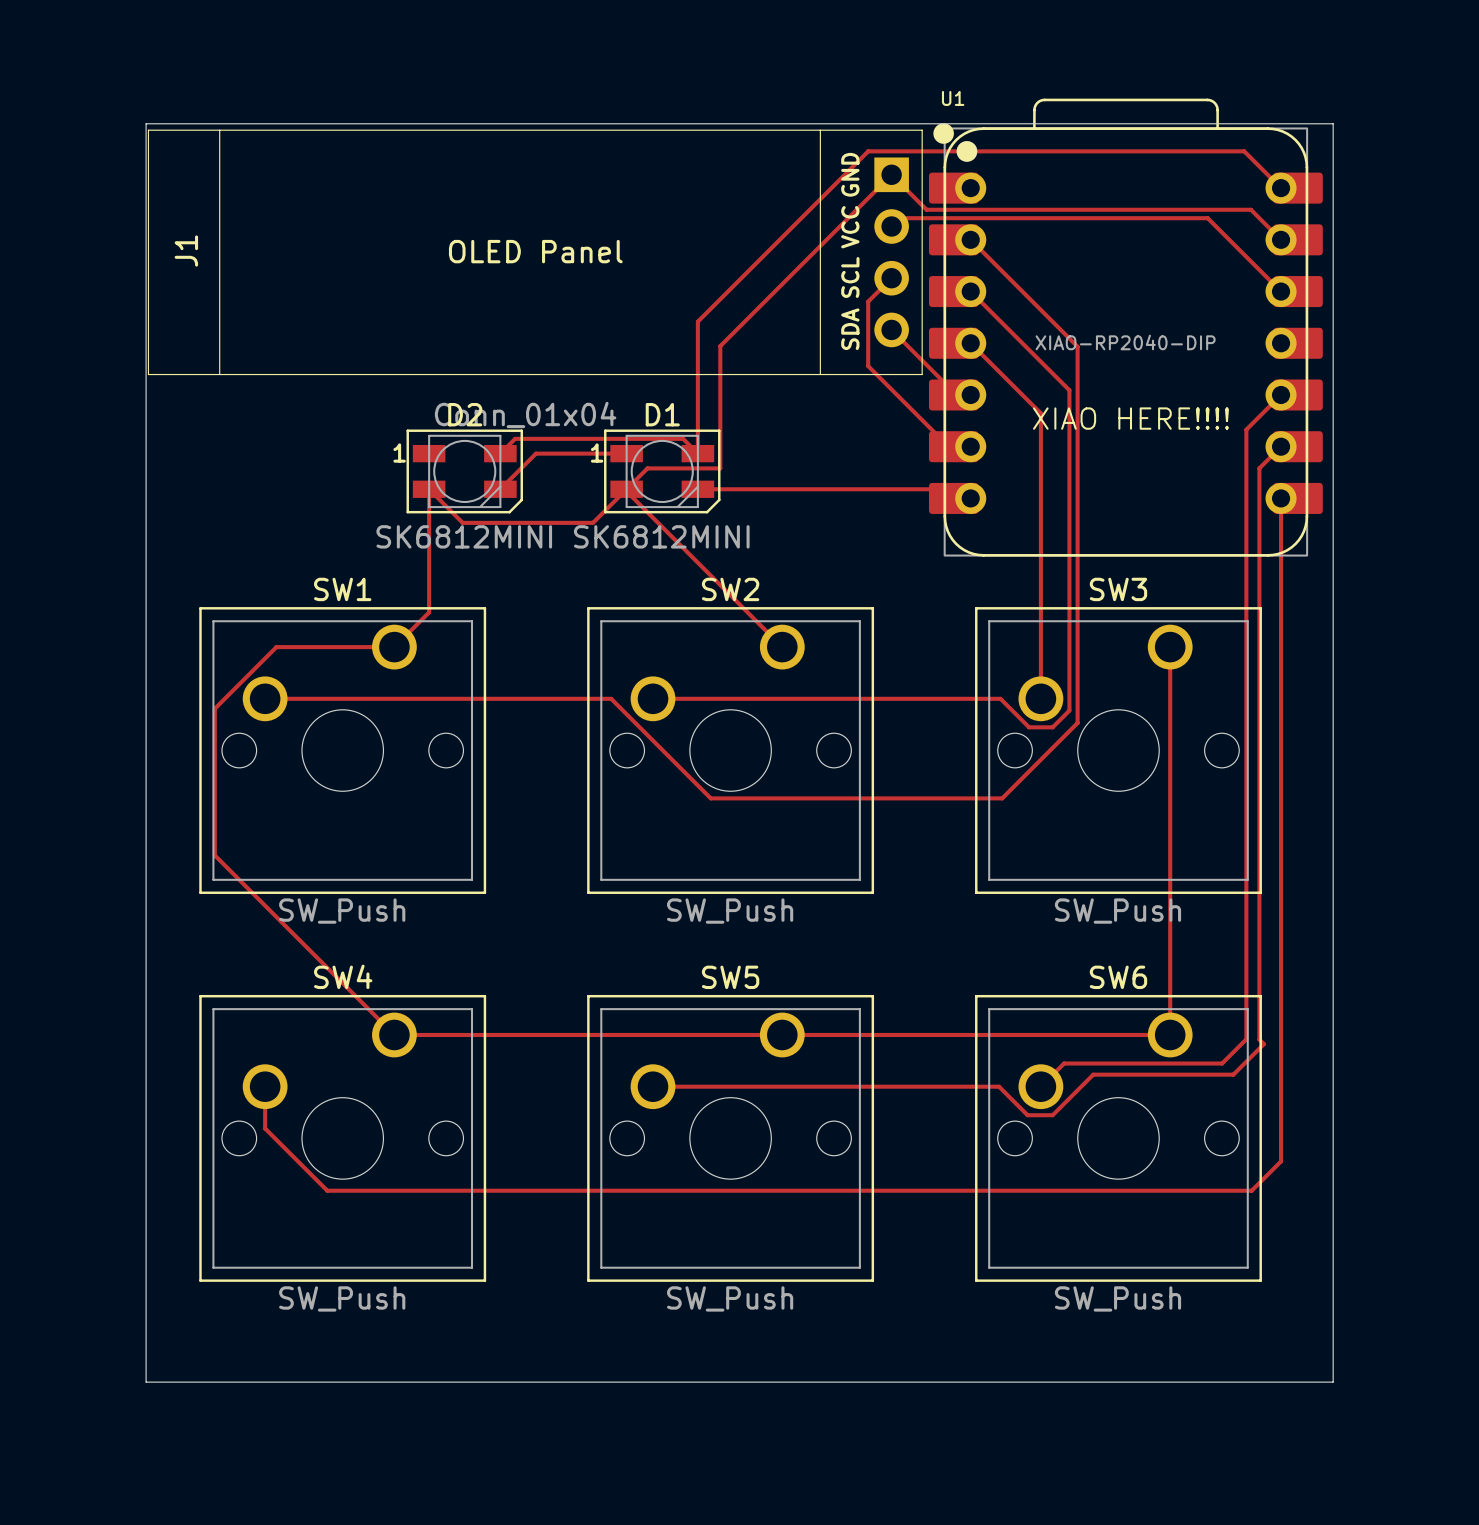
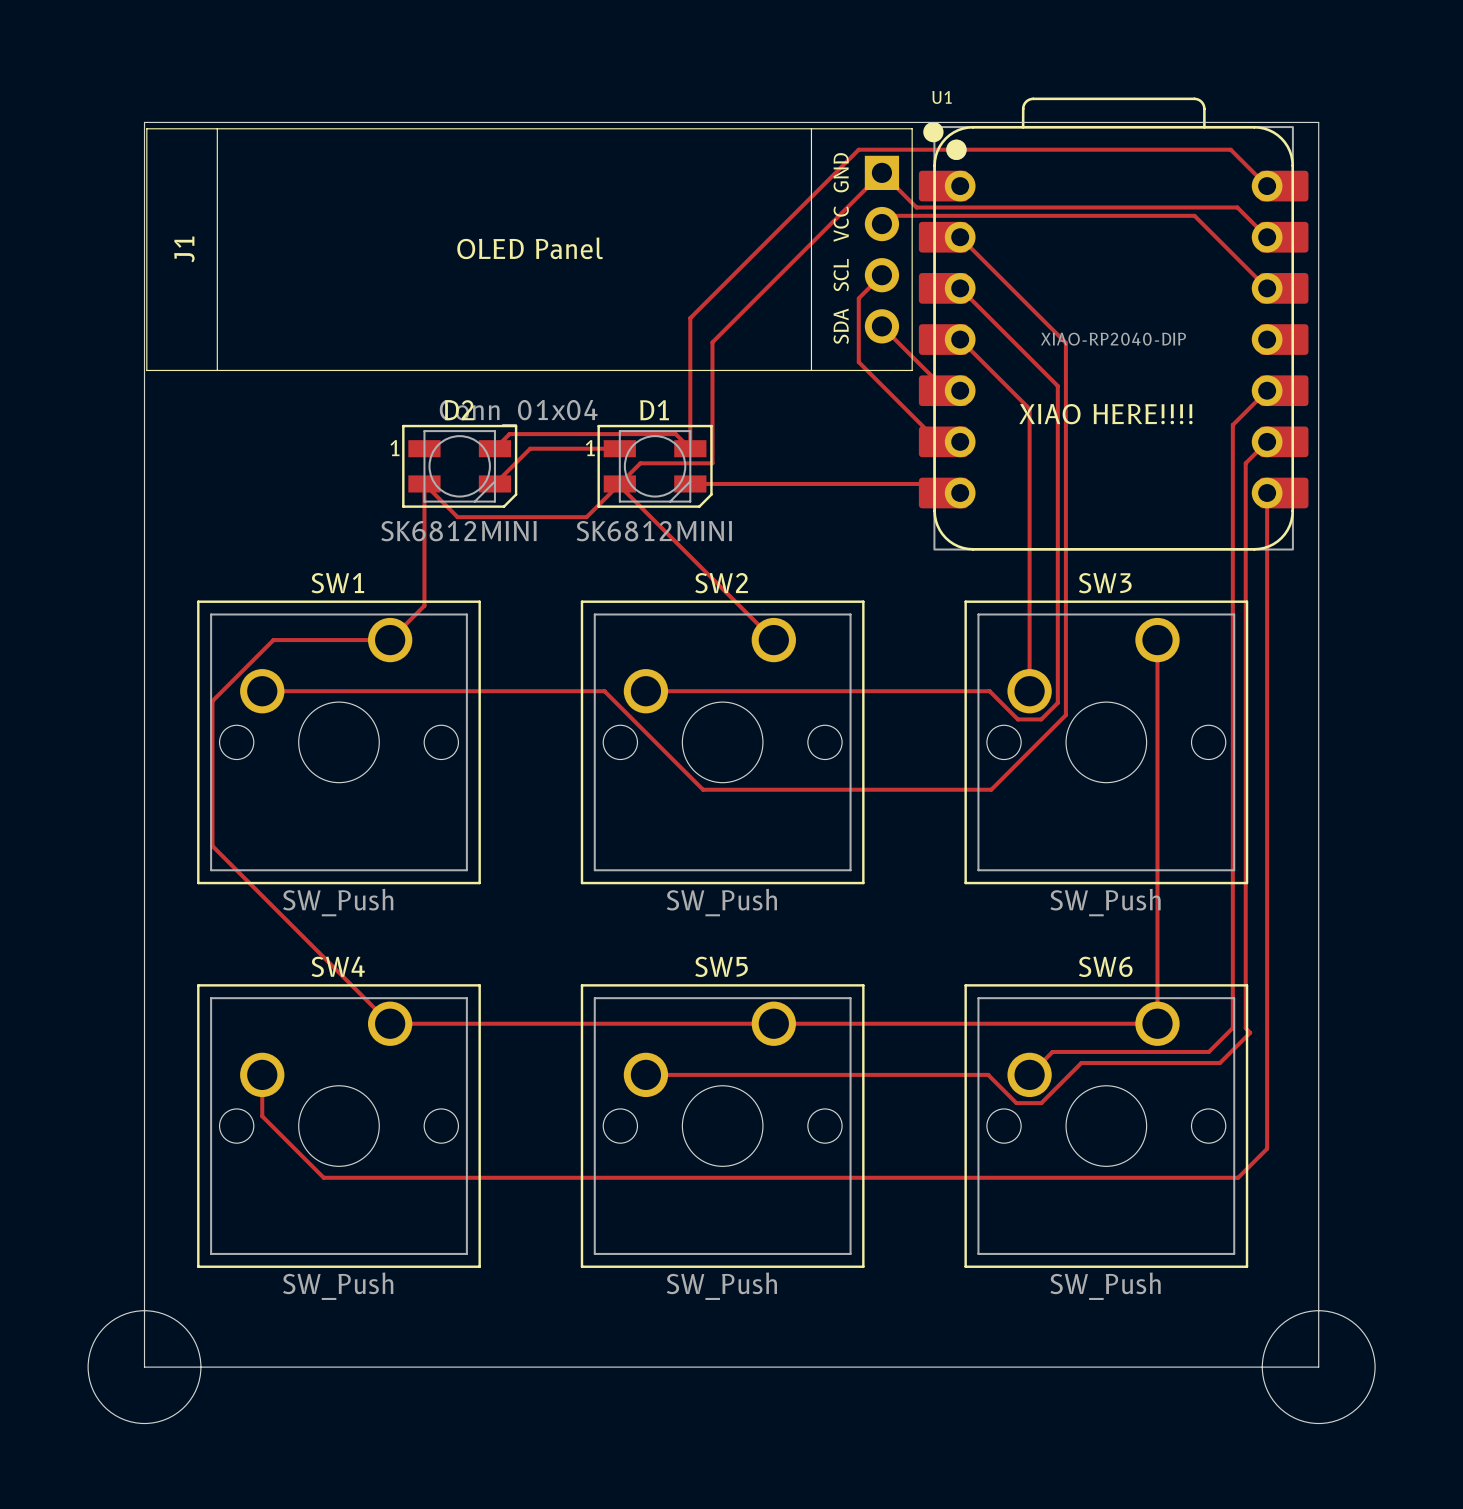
round board edge: none -> [87, 1310, 202, 1425]
round board edge: none -> [1261, 1310, 1376, 1425]

